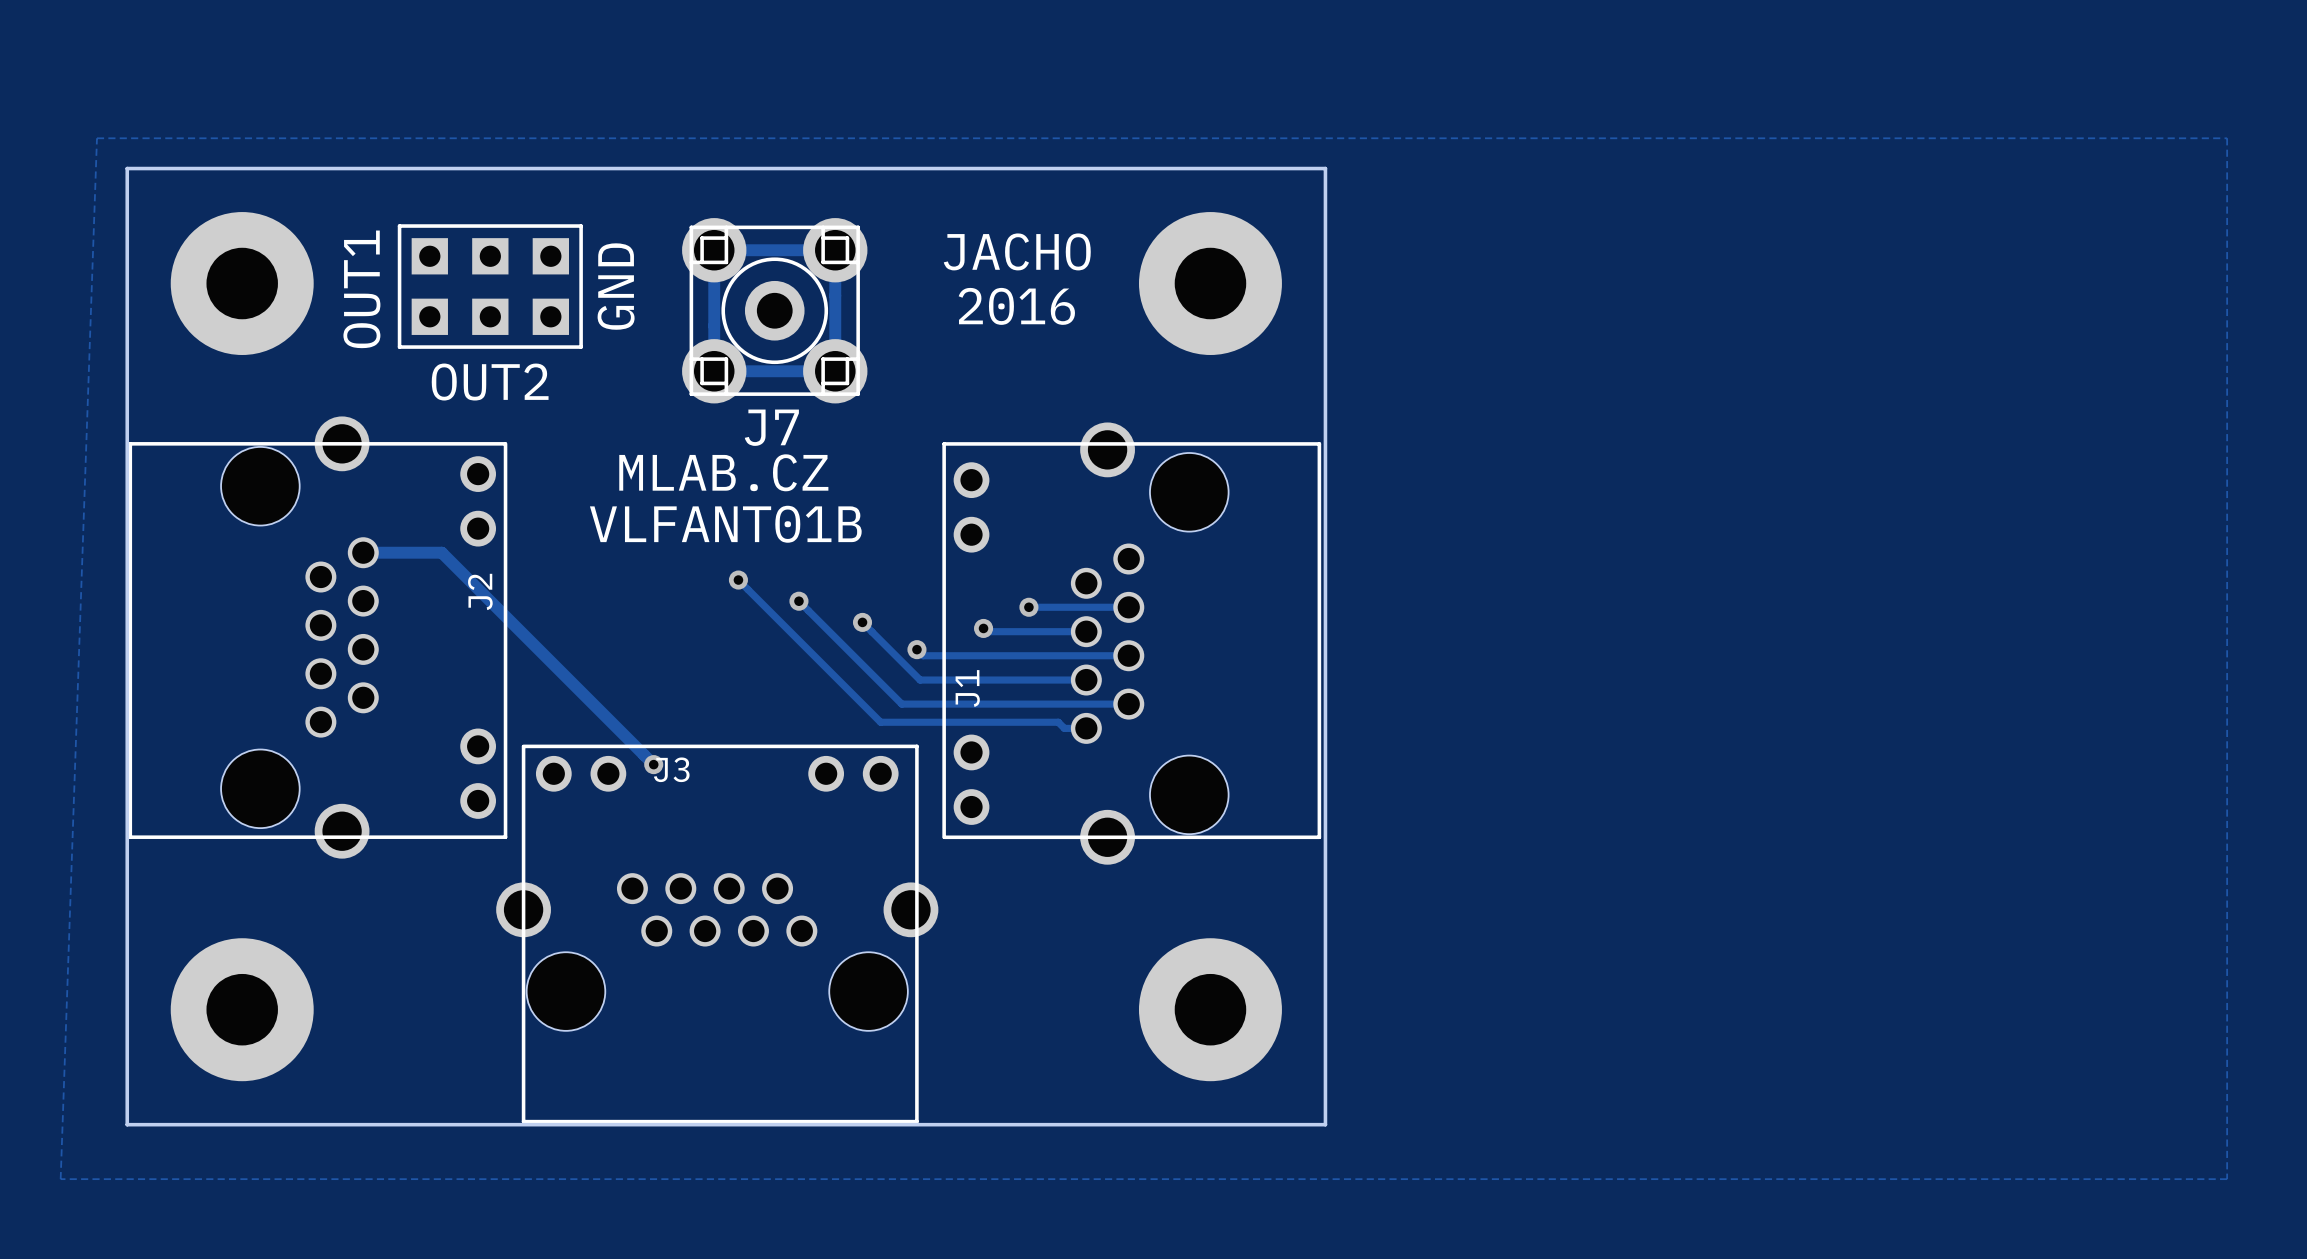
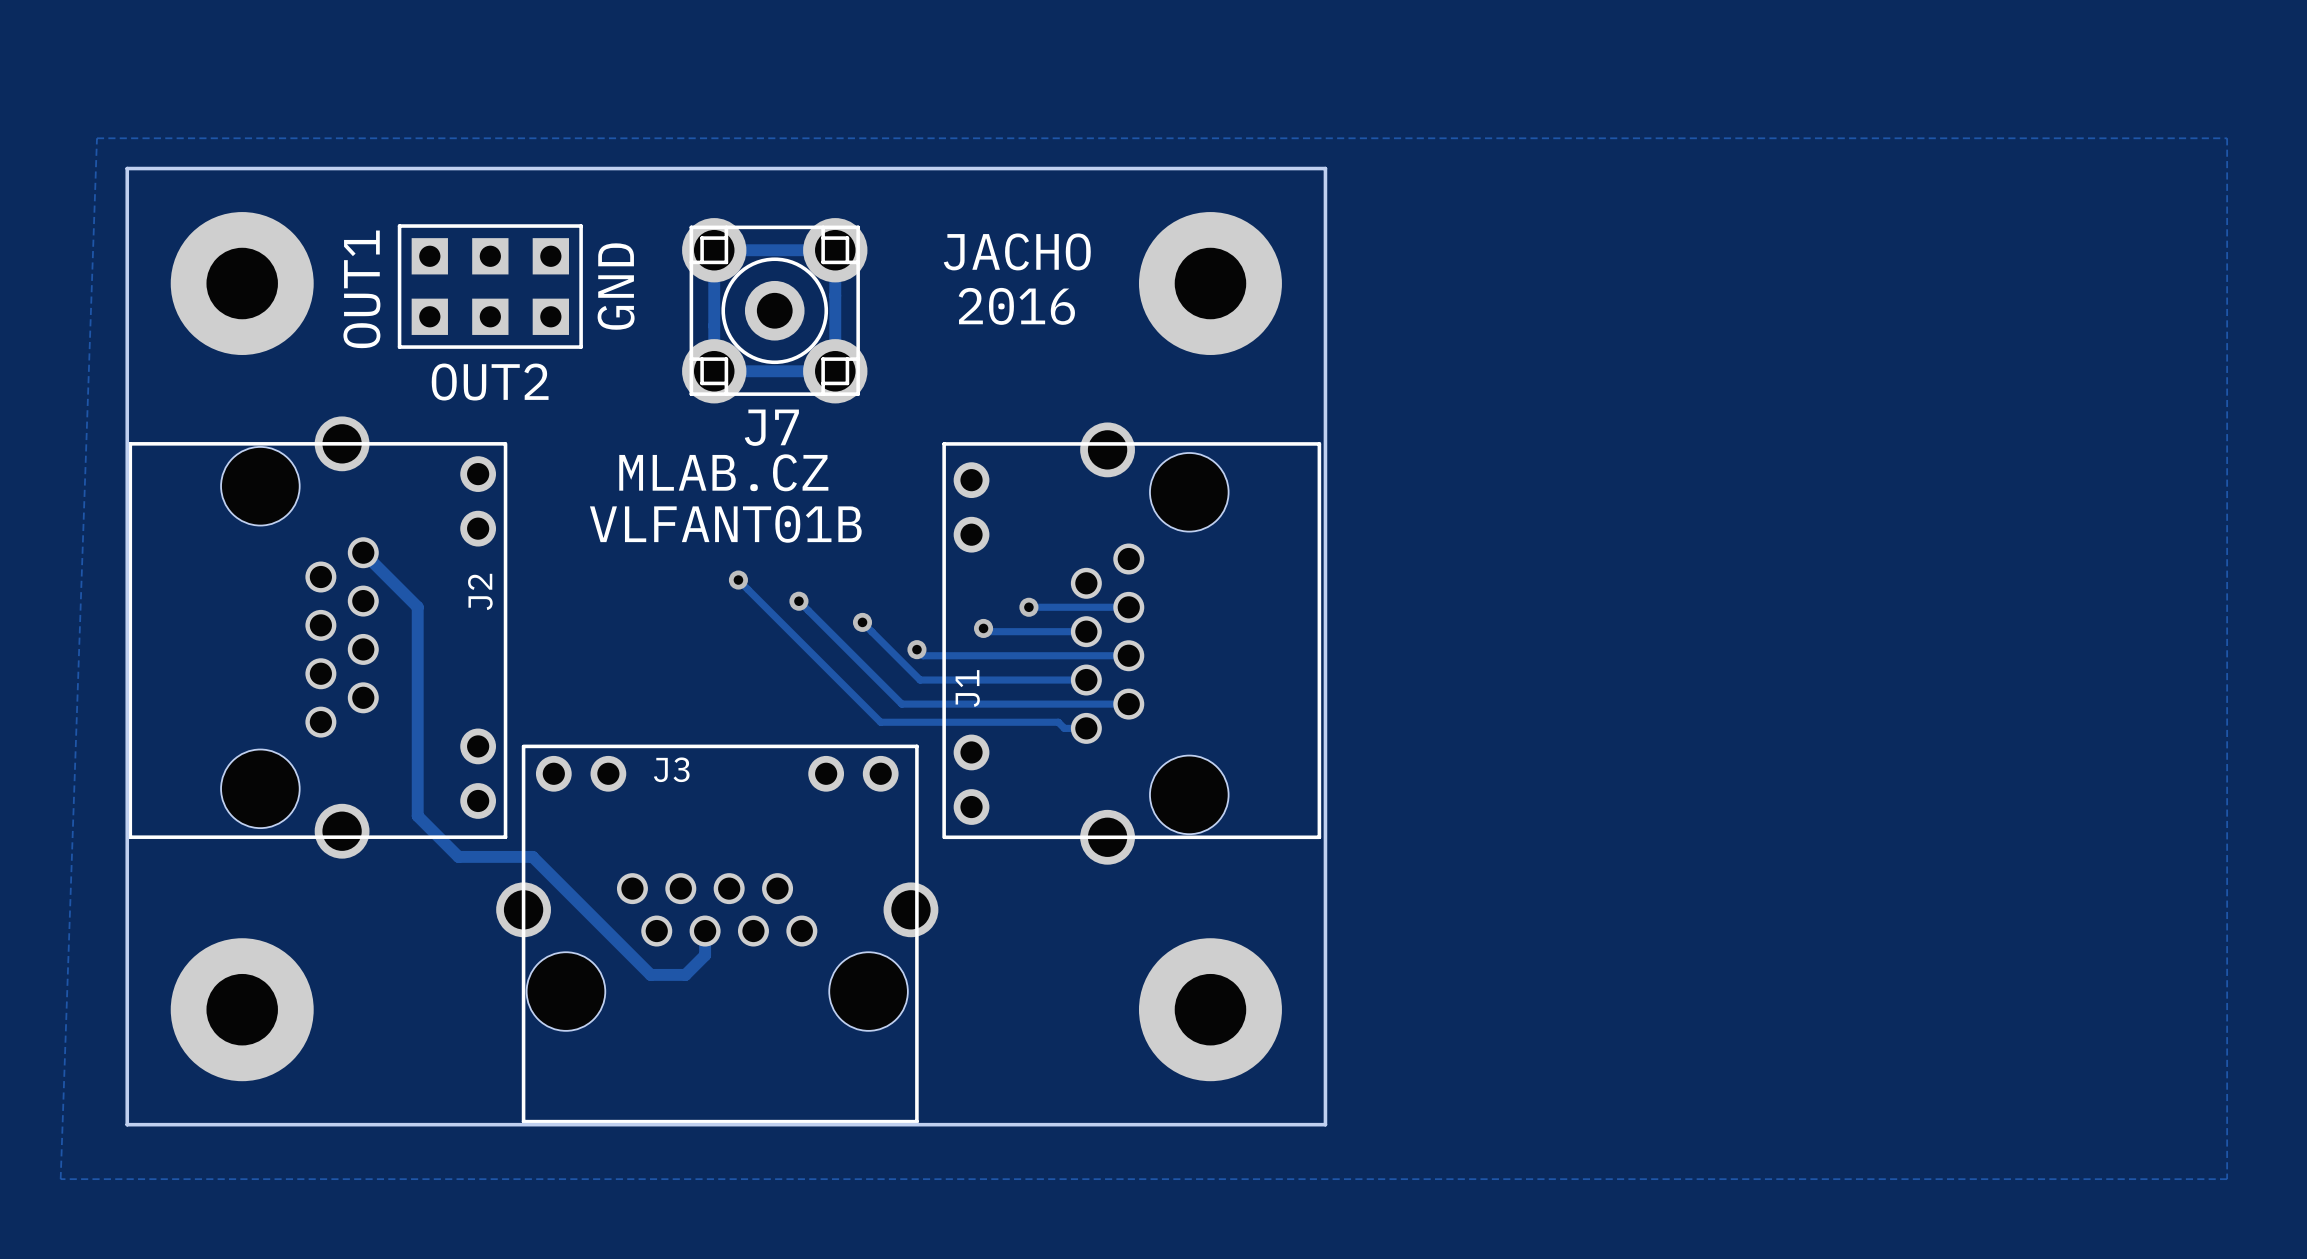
track: (363, 552) (441, 552) (653, 764) -> (363, 552) (417, 607) (417, 816) (458, 856) (532, 856) (650, 974) (685, 974) (705, 955) (705, 931)
via: (653, 764) -> none

